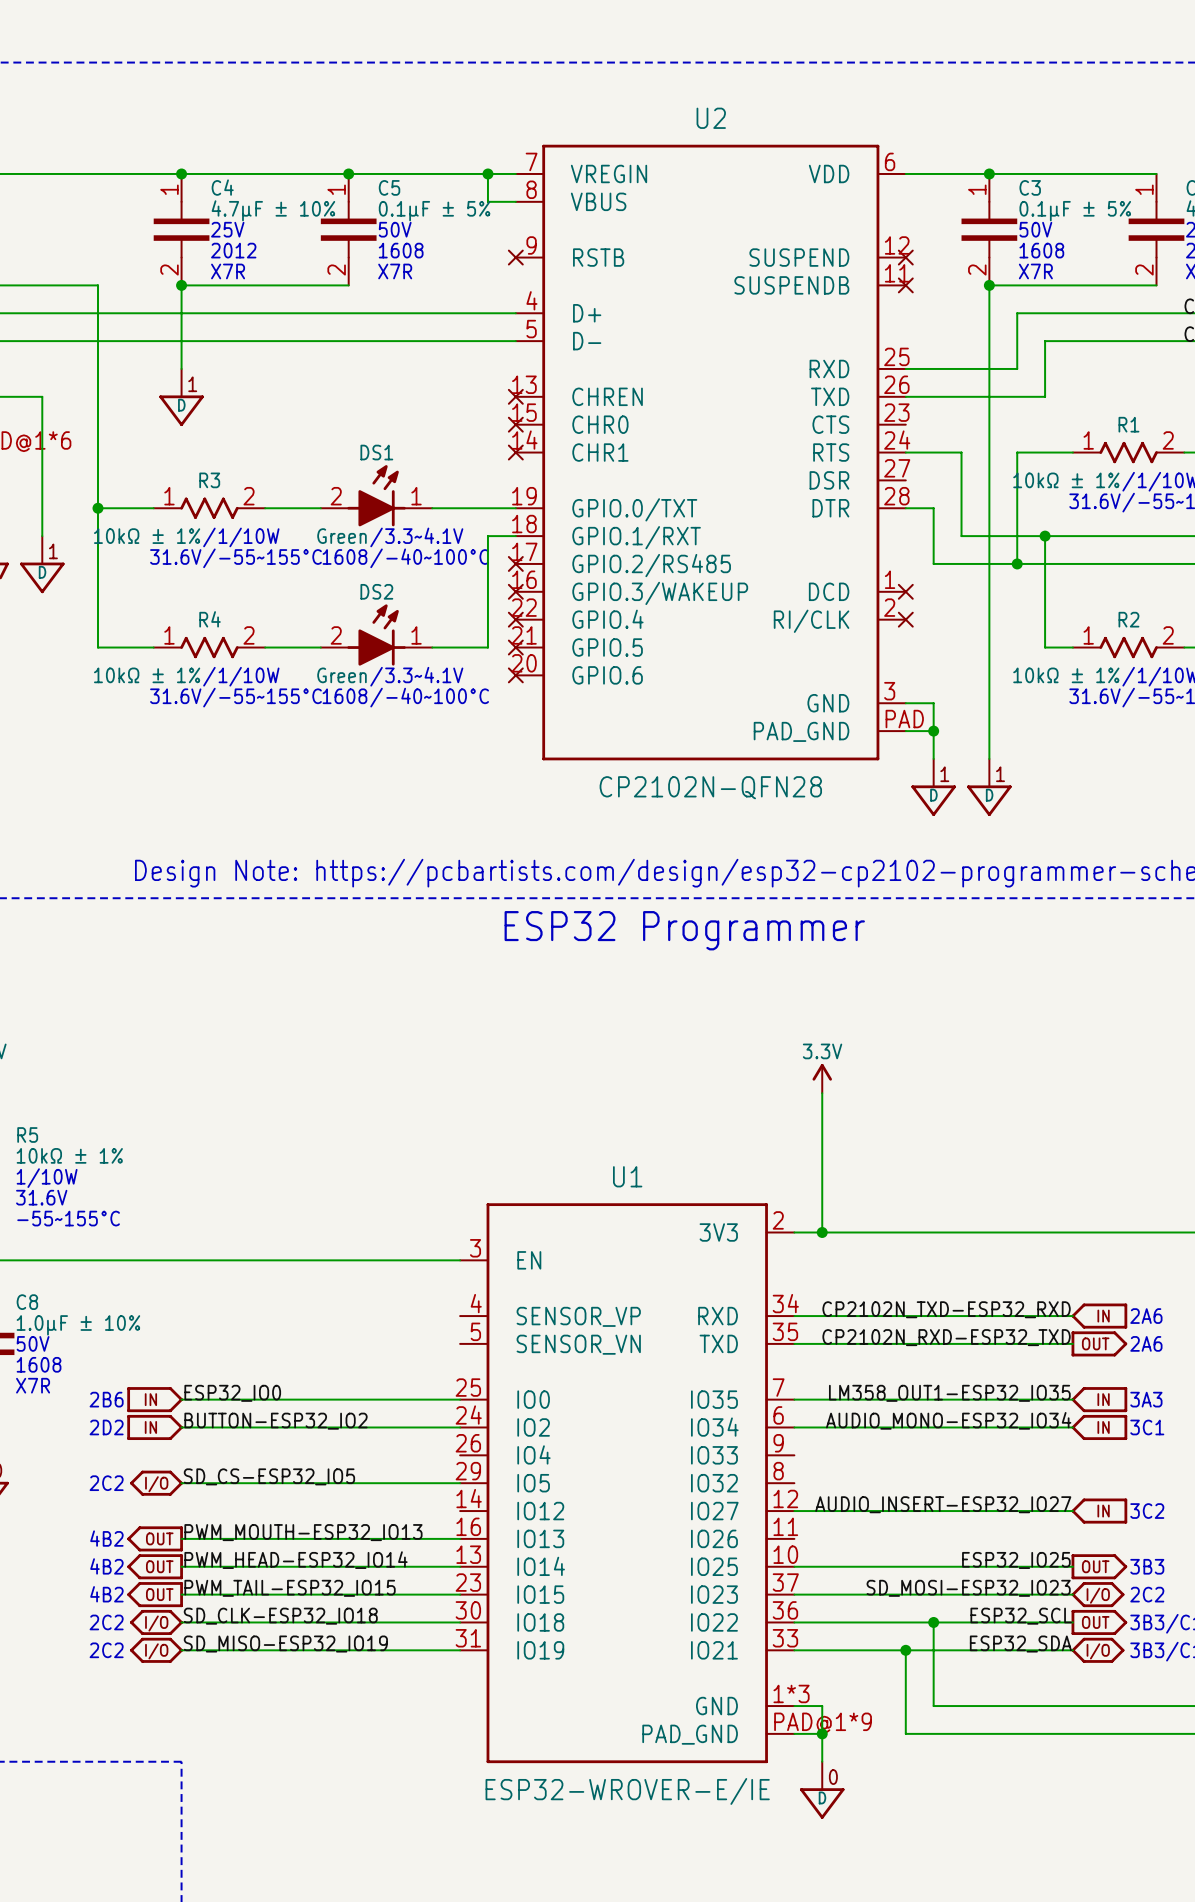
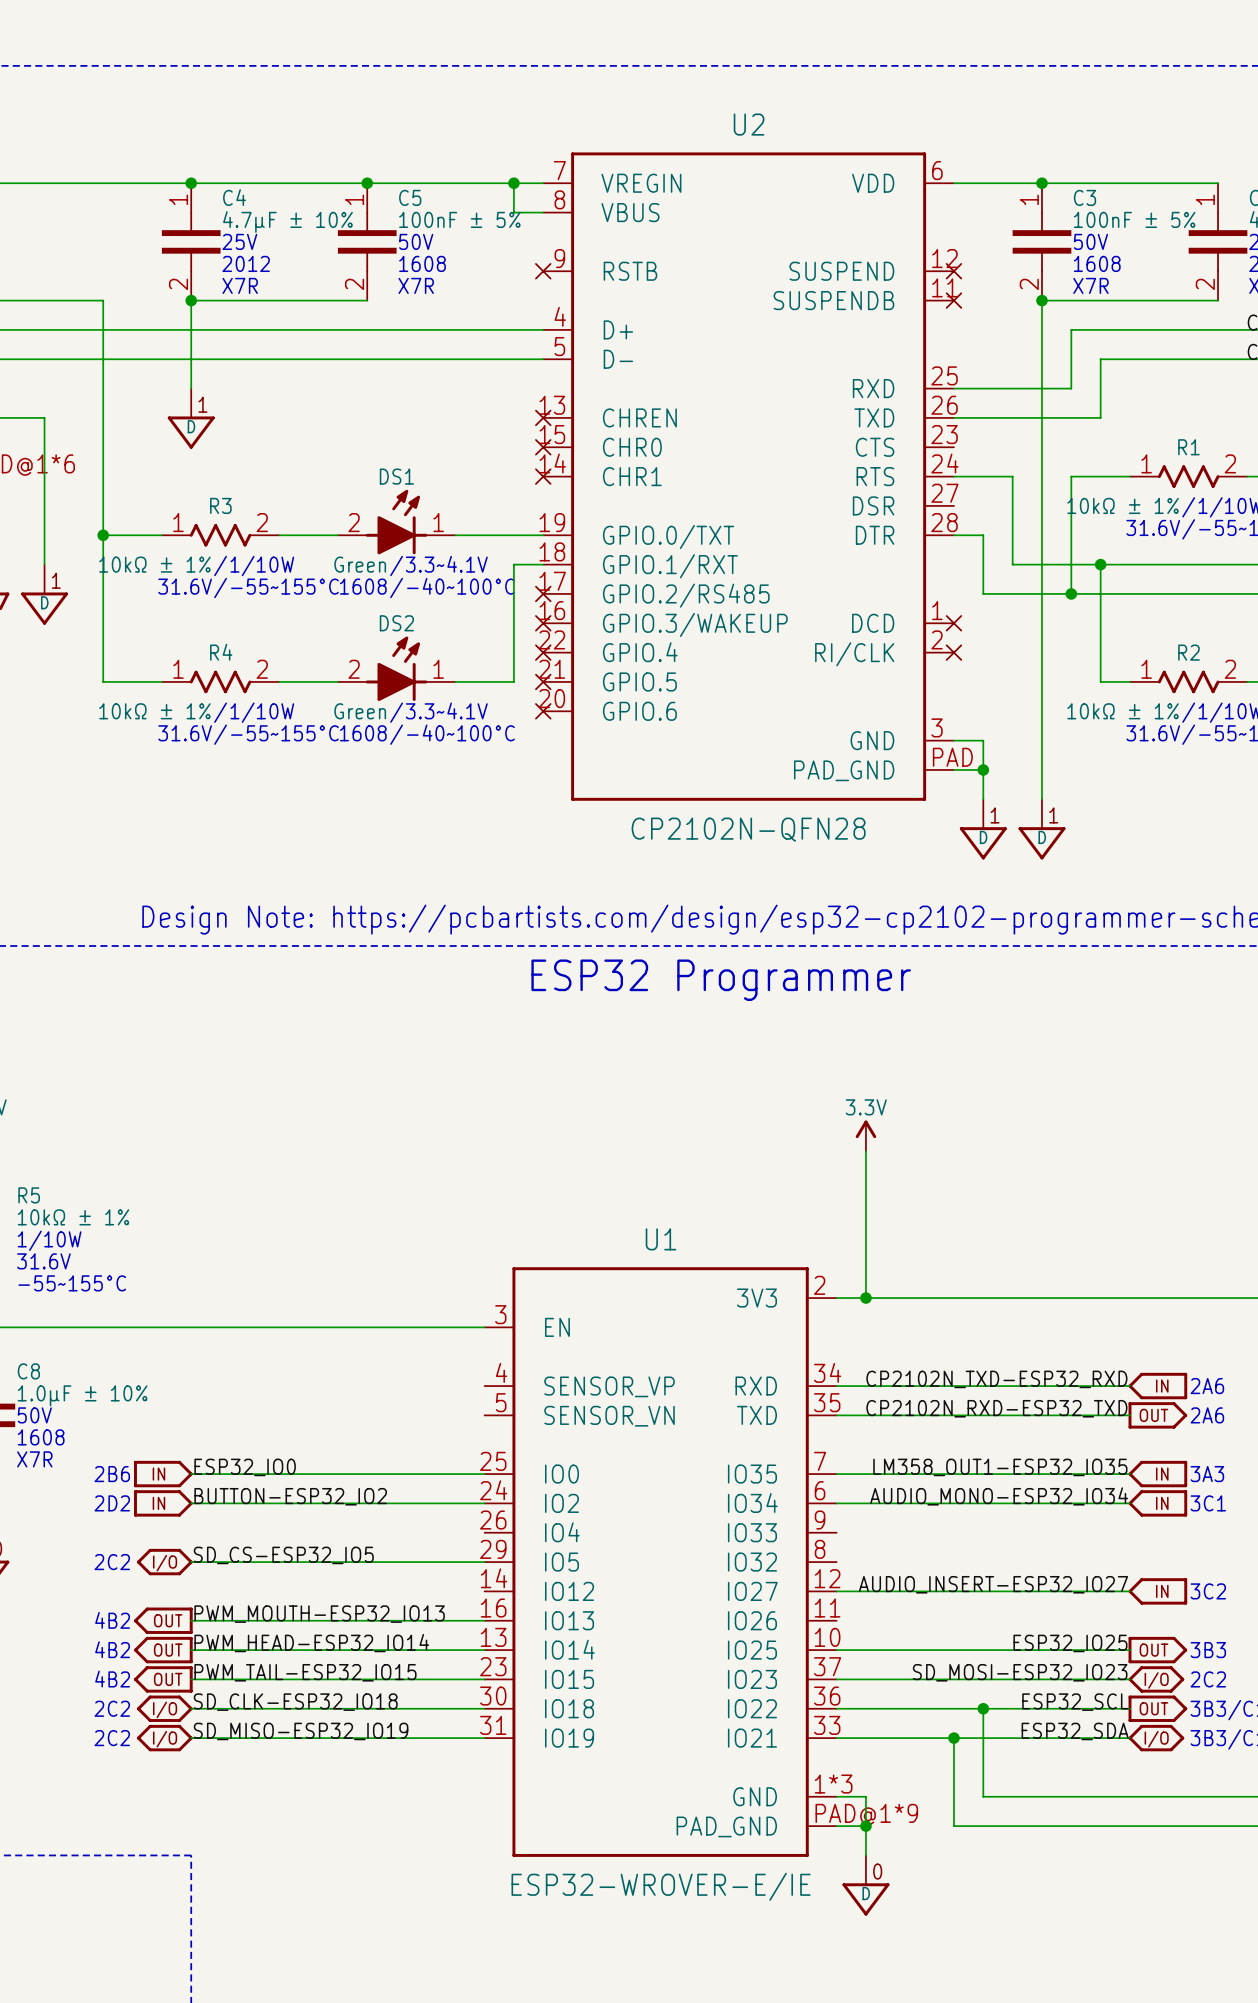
C5 value: 0.1µF ± 5% (434, 211) -> 100nF ± 5% (459, 219)
C3 value: 0.1µF ± 5% (1075, 211) -> 100nF ± 5% (1134, 219)

